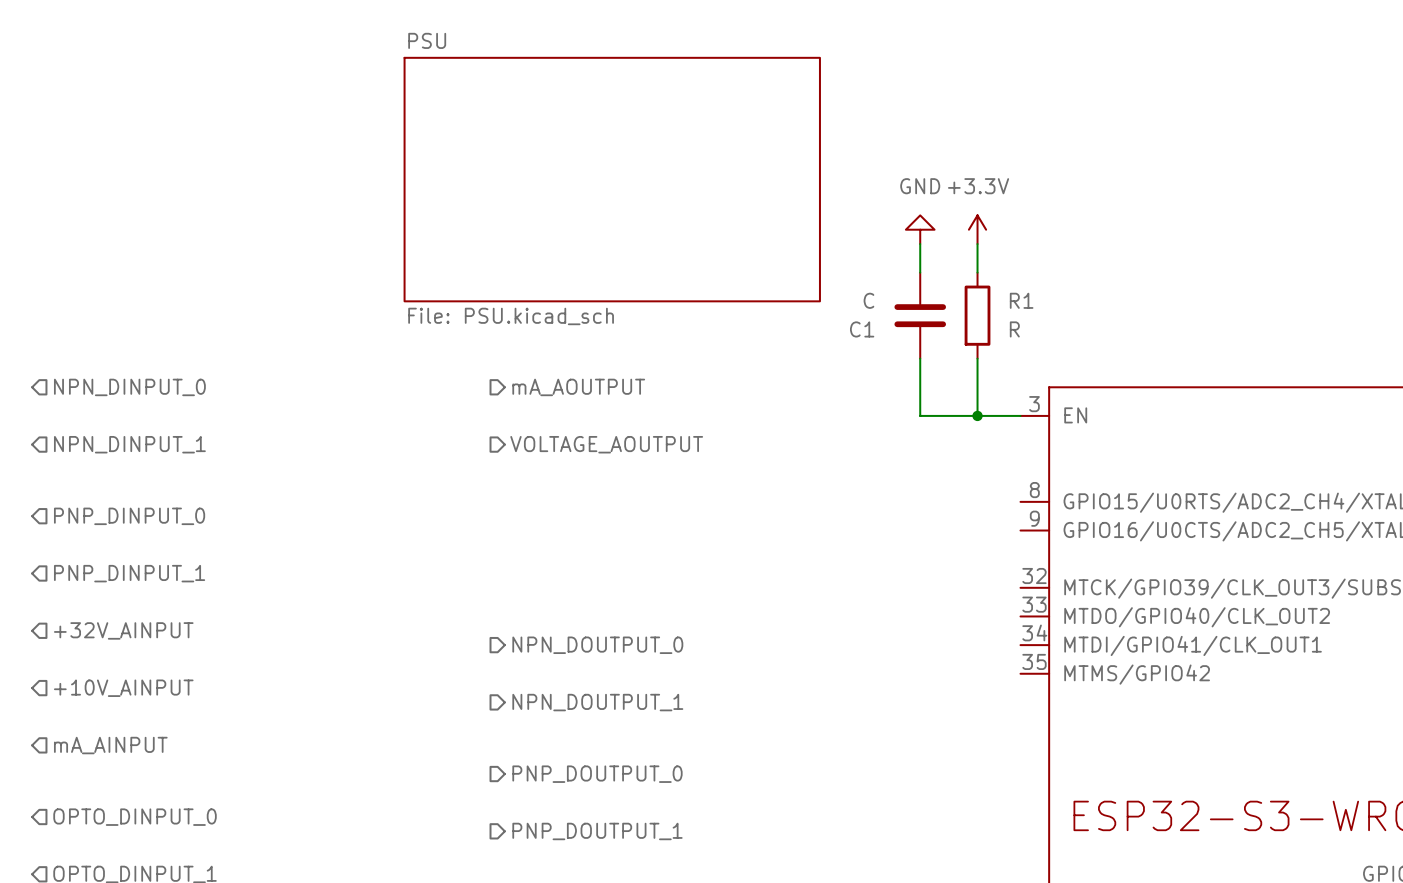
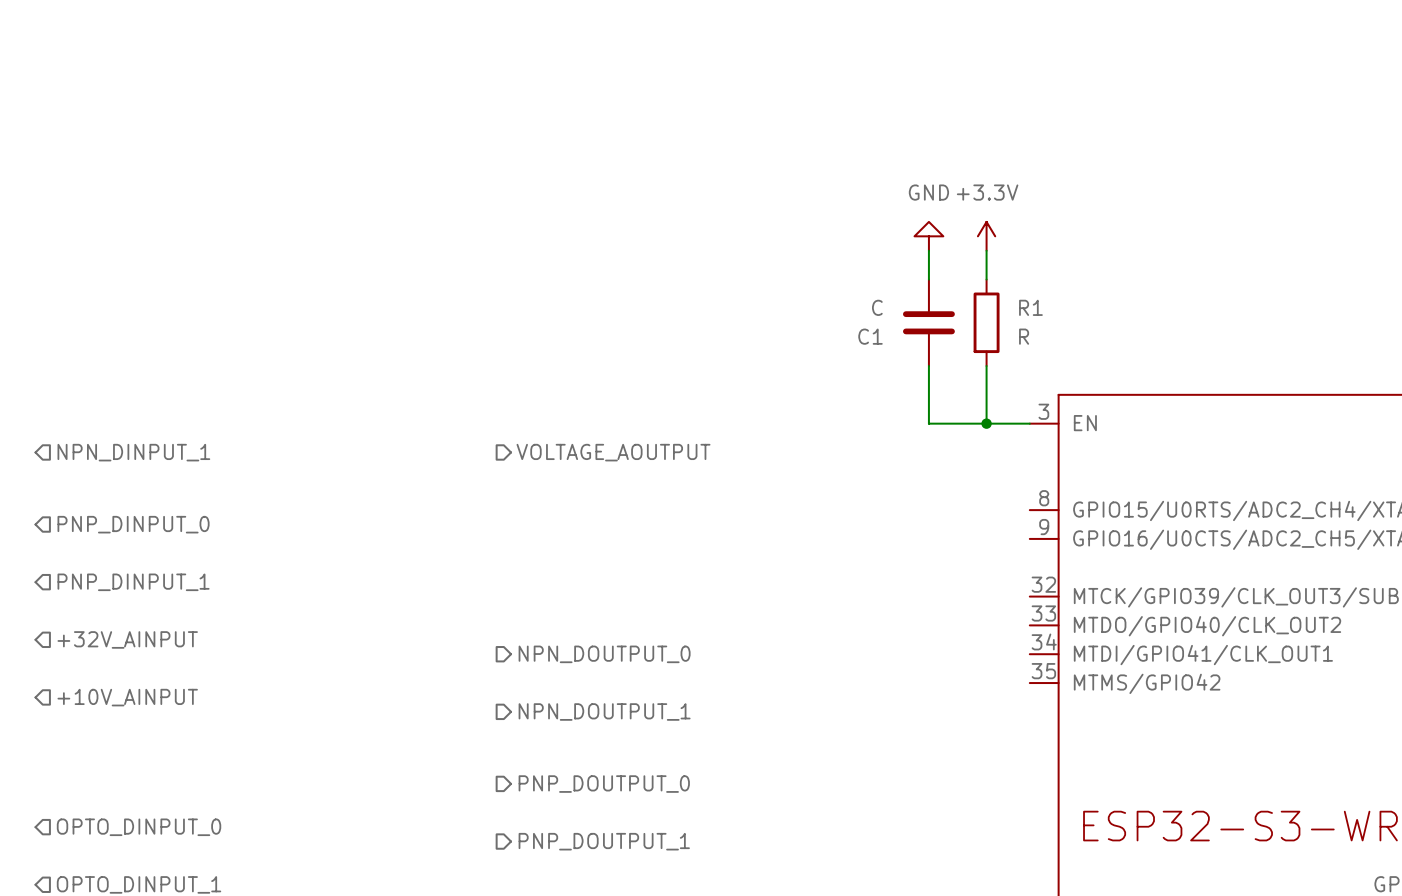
sheet PSU: File: PSU.kicad_sch (612, 179) -> none
hierarchical label: NPN_DINPUT_0 (129, 387) -> none
hierarchical label: mA_AOUTPUT (578, 387) -> none
hierarchical label: mA_AINPUT (110, 745) -> none

